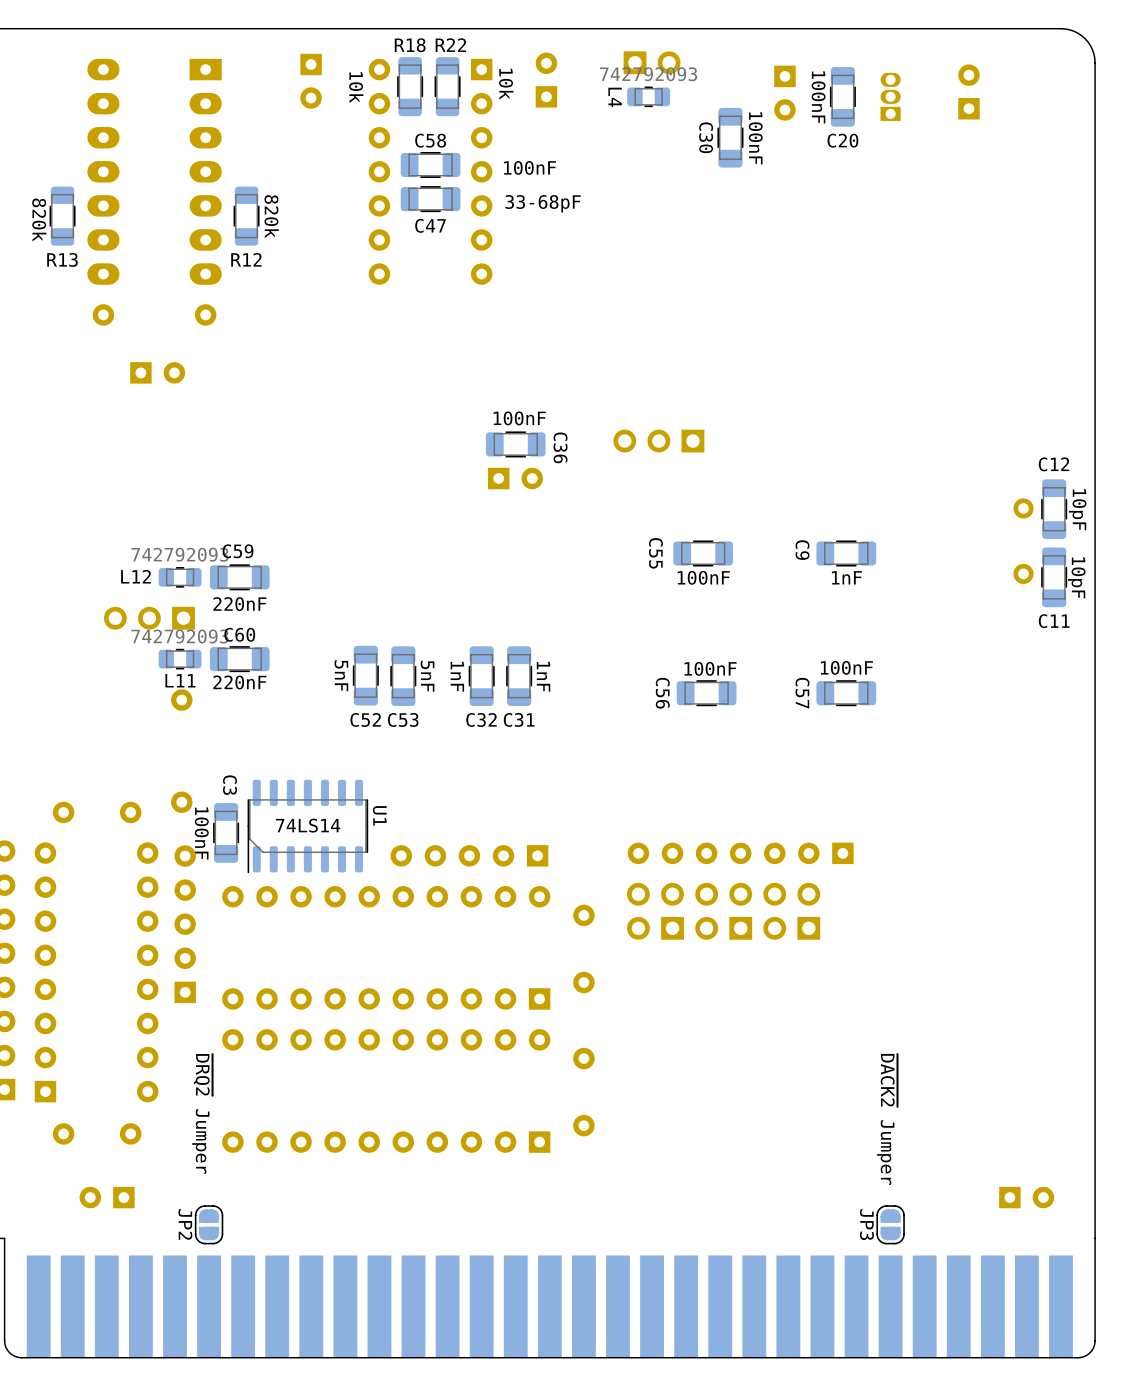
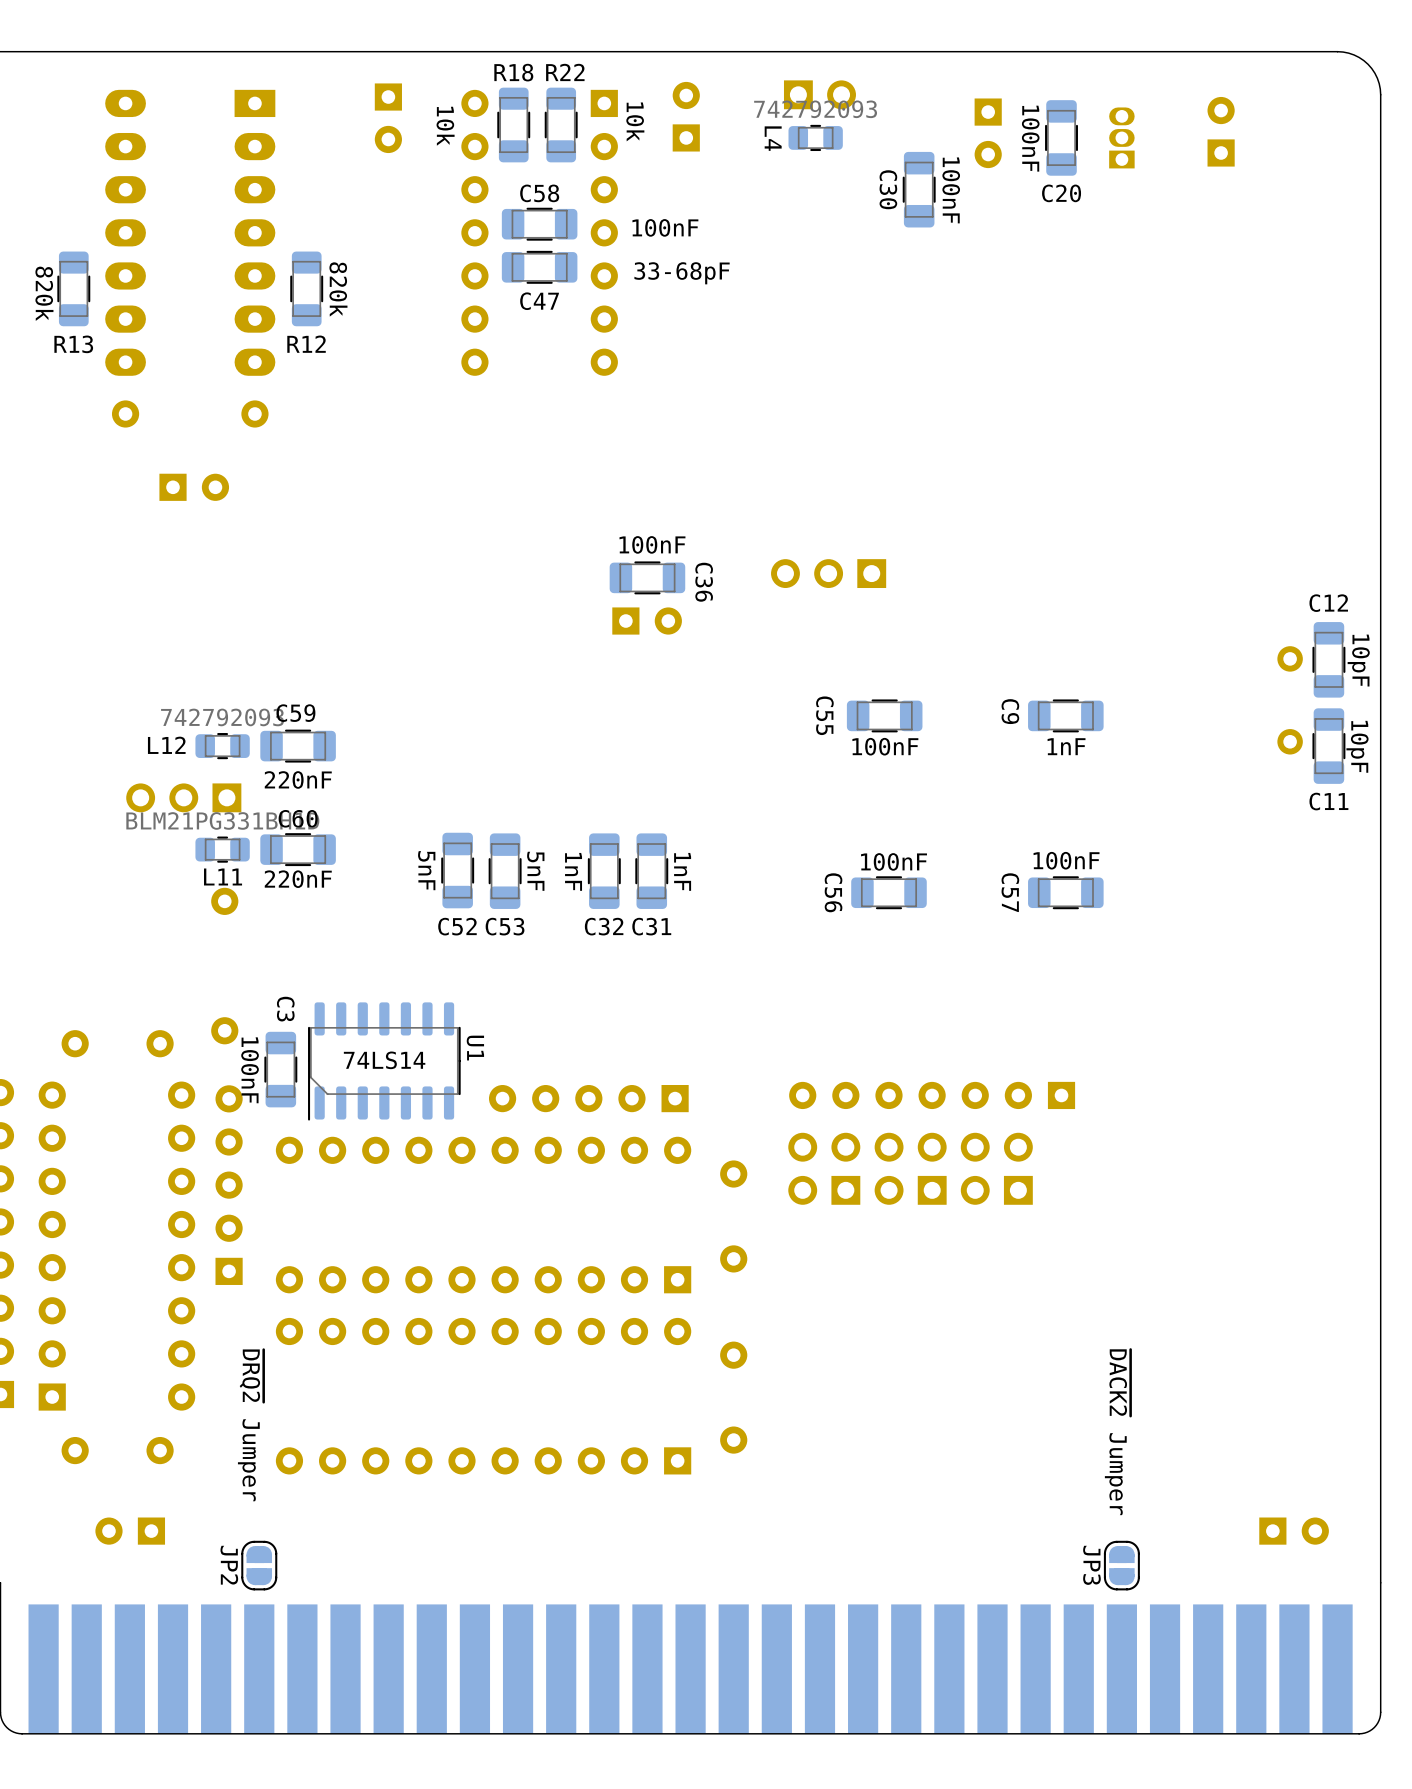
L11 value: 742792093 (180, 636) -> BLM21PG331BH1D (222, 820)

